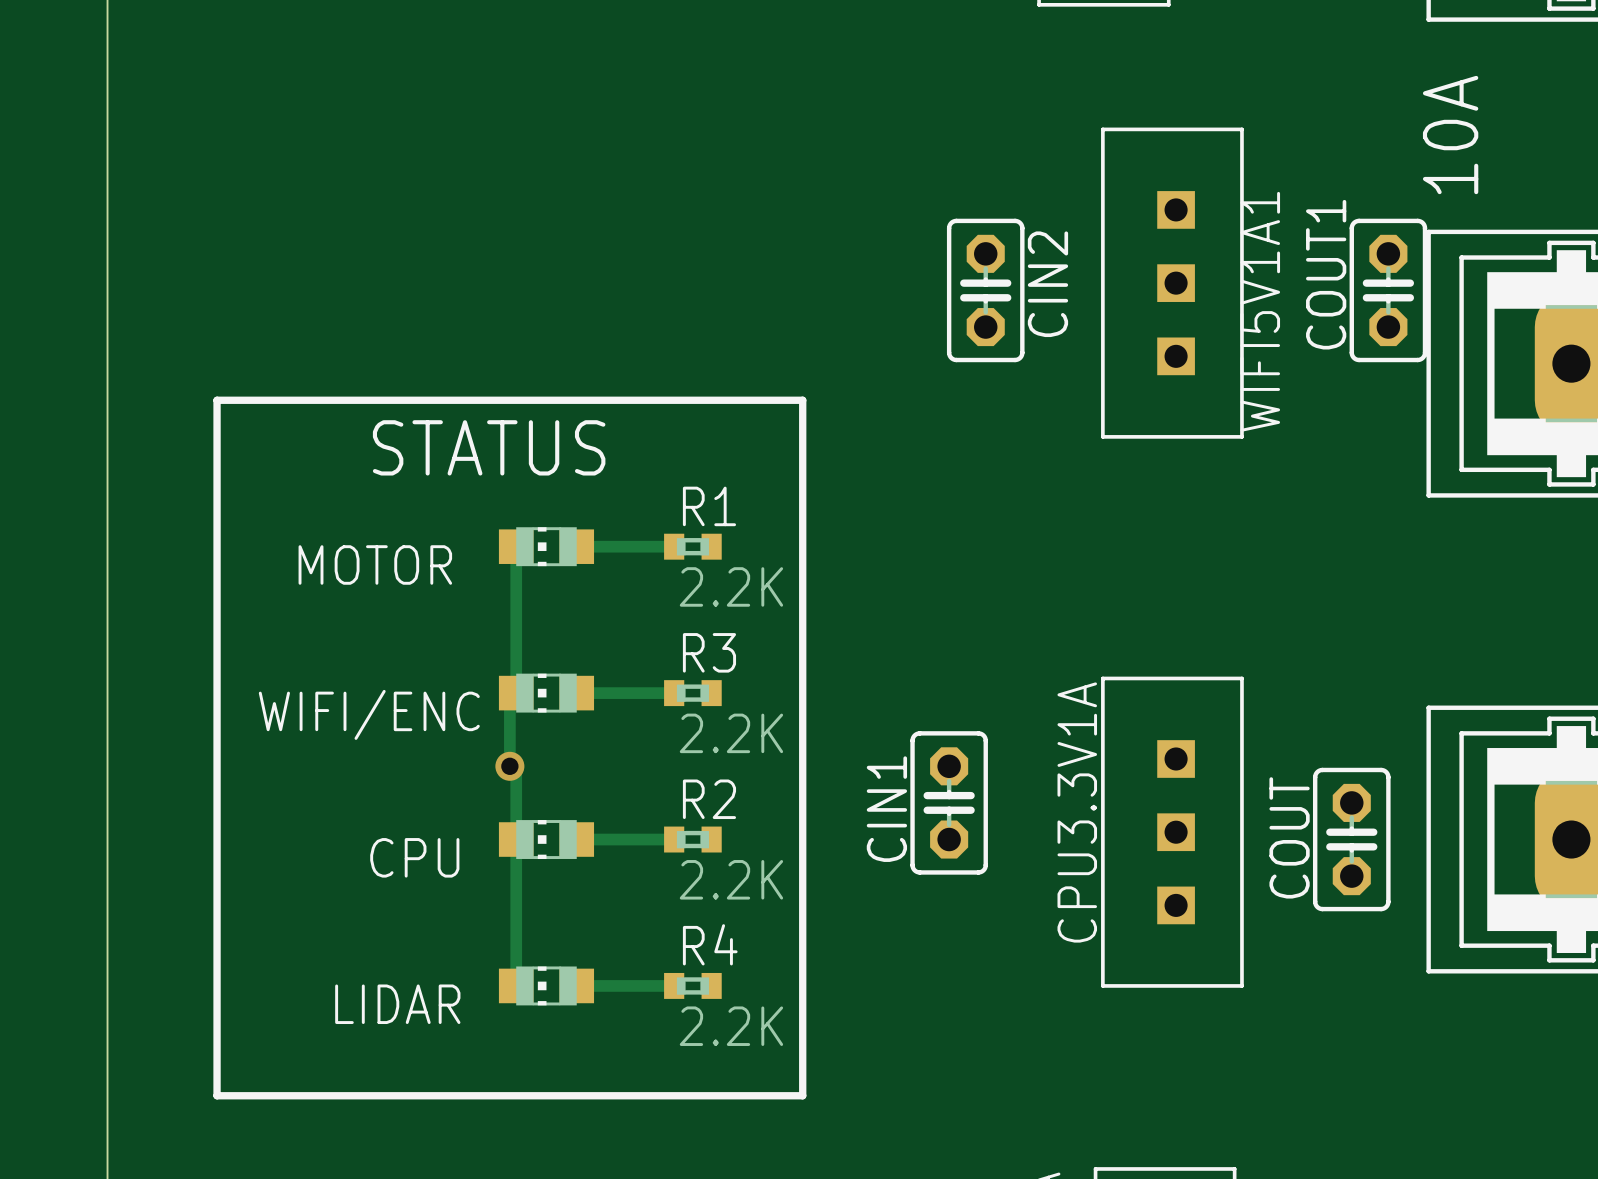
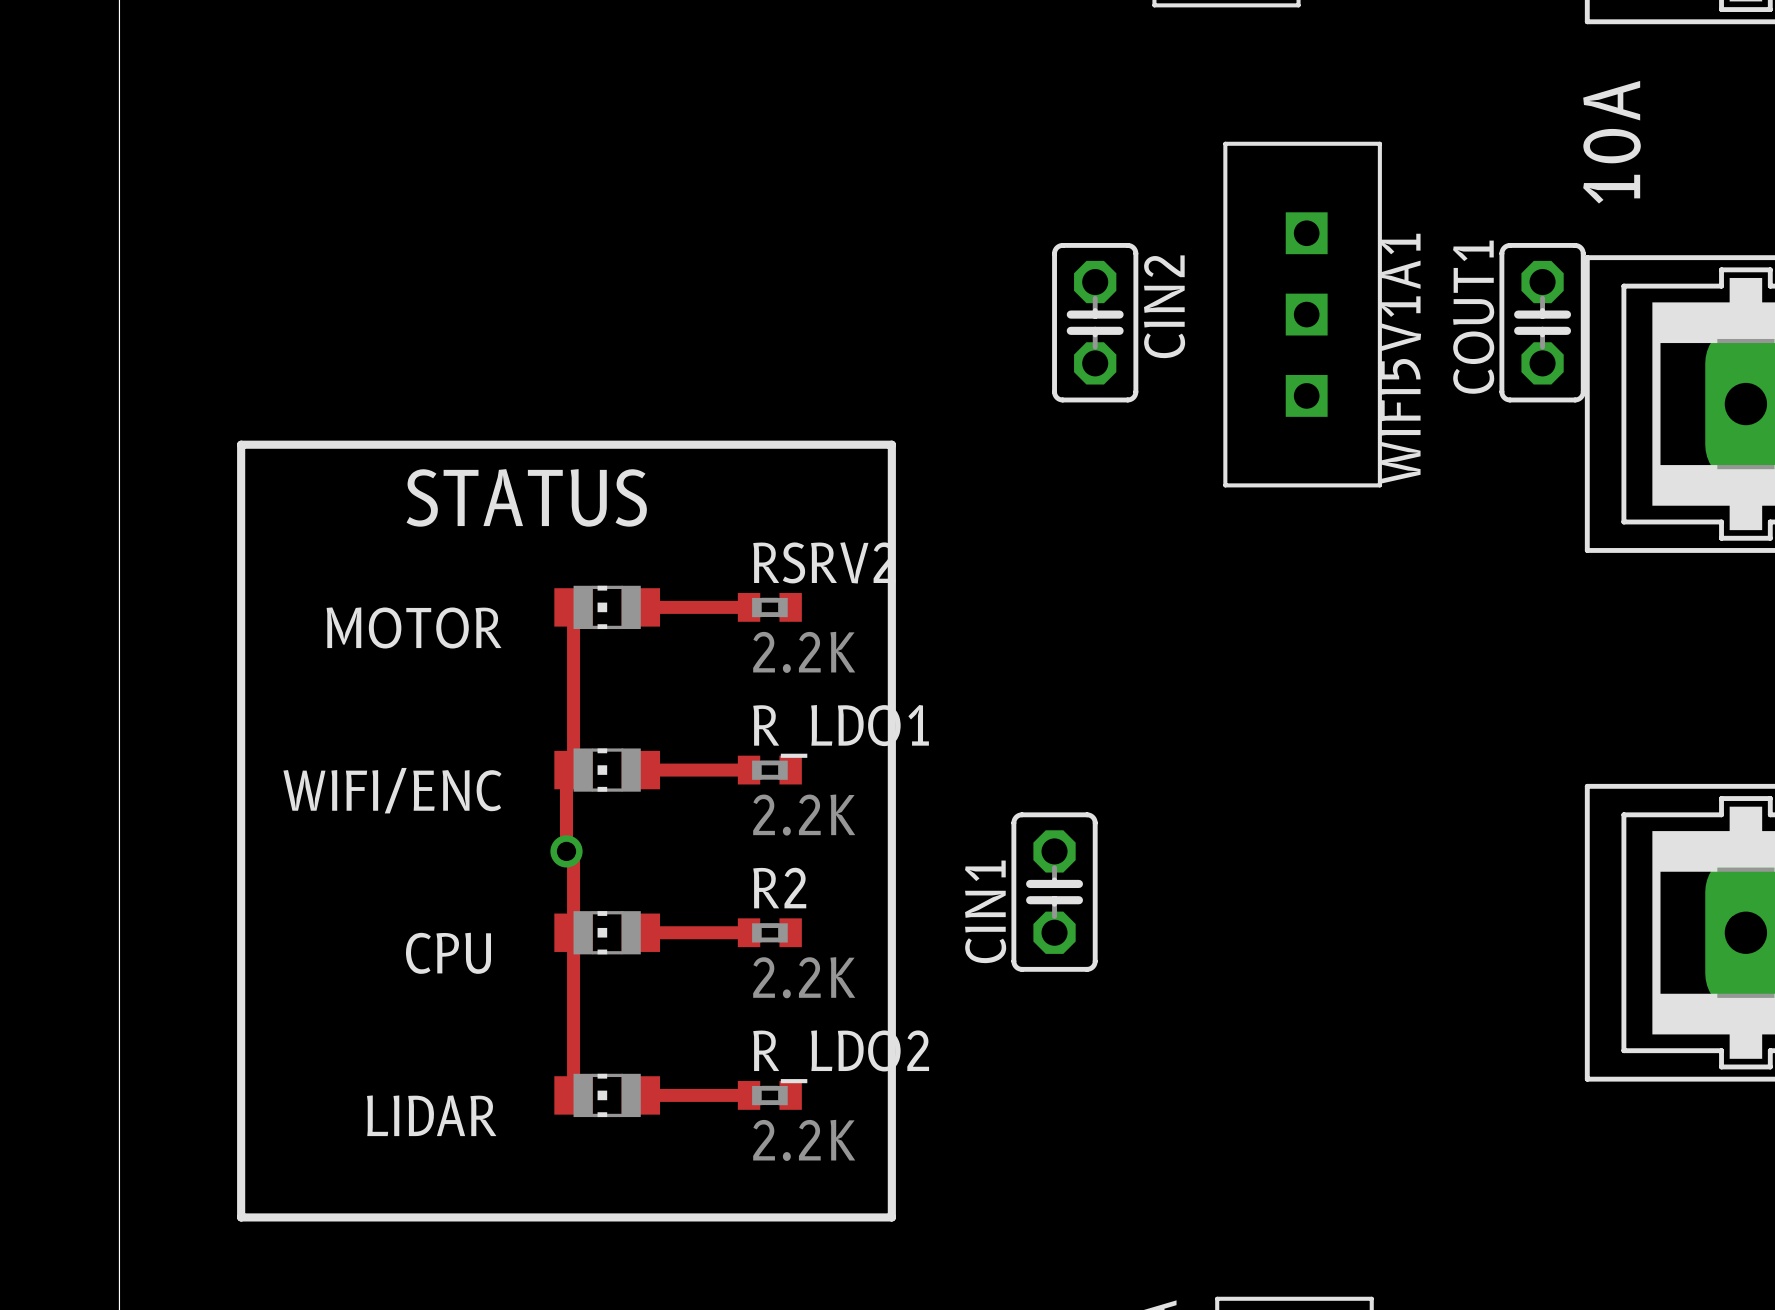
R1 name: R1 (709, 506) -> RSRV2 (824, 562)
R3 name: R3 (709, 652) -> R_LDO1 (841, 731)
CPU3.3V1A: (1172, 832) -> none
COUT: (1351, 839) -> none
R4 name: R4 (710, 944) -> R_LDO2 (841, 1056)

